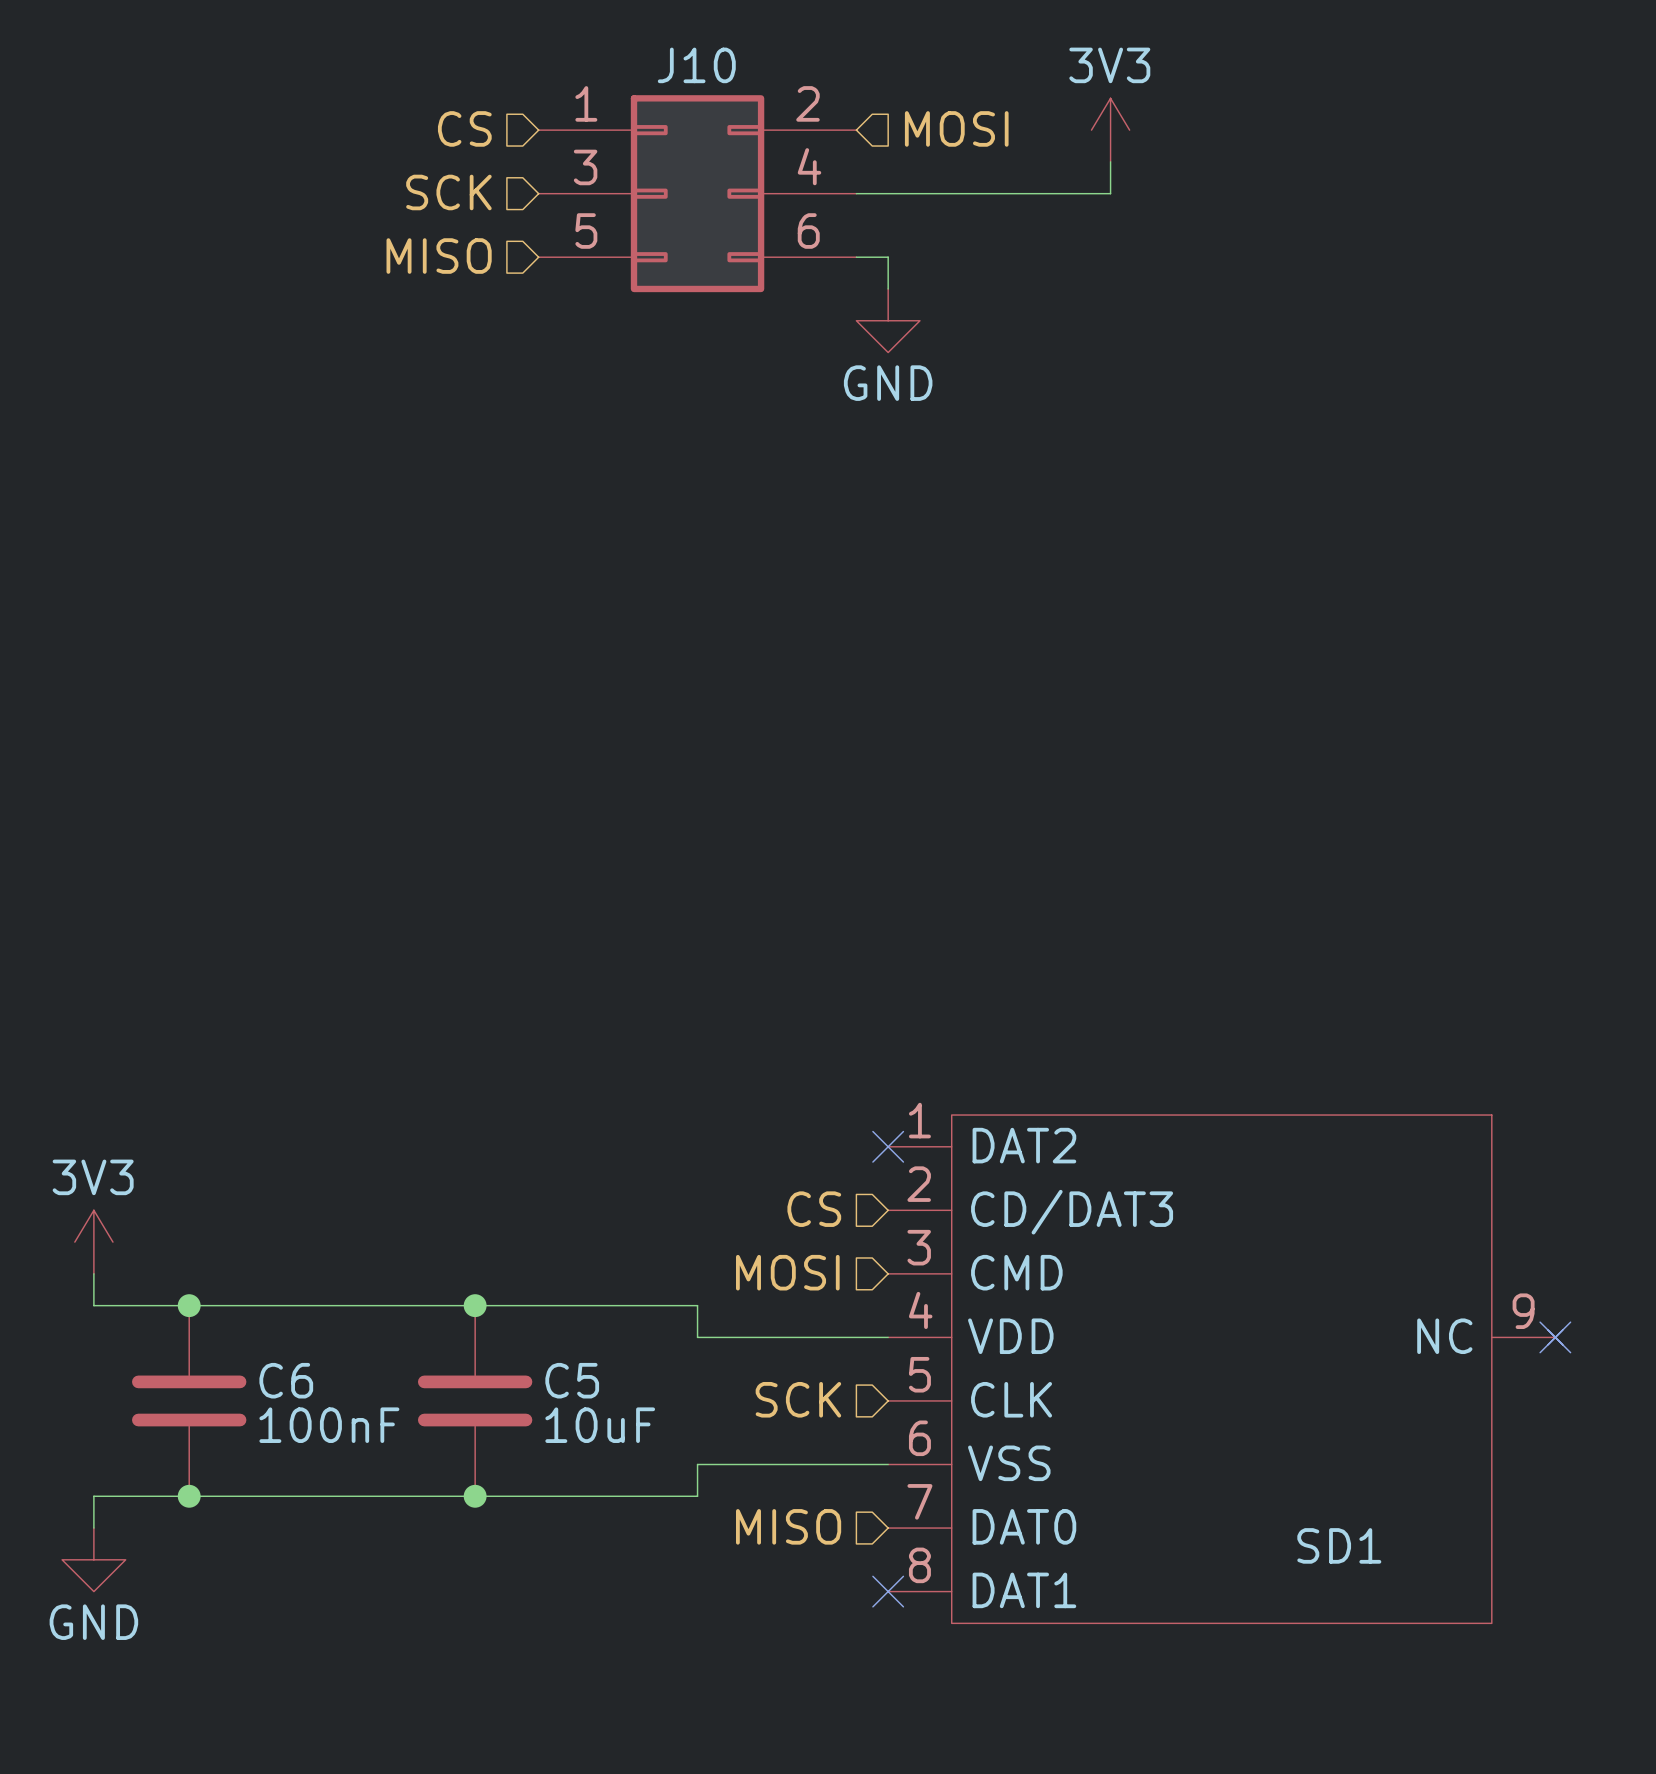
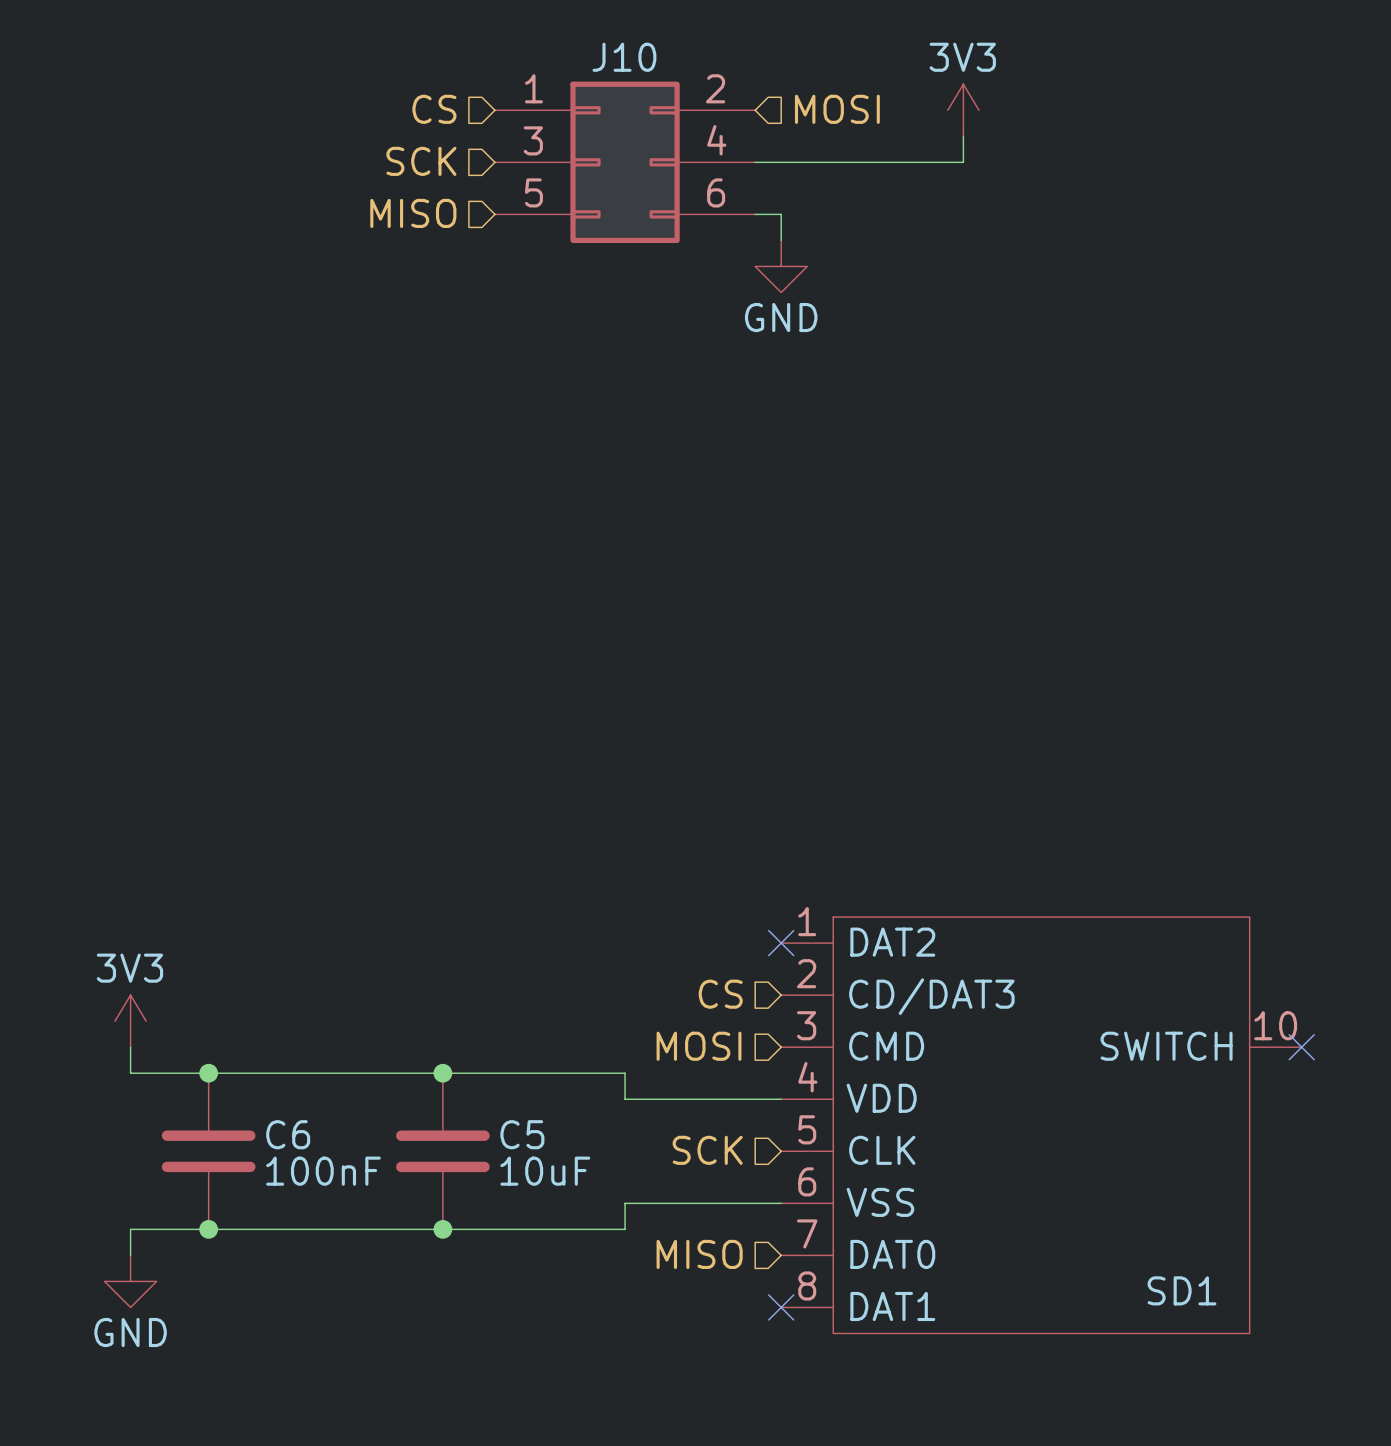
SD1 symbol: [888, 1115, 1563, 1624] -> [781, 917, 1302, 1334]
no-connect mark position: (1555, 1337) -> (1301, 1047)
SD1 name position: SD1 (1339, 1545) -> SD1 (1182, 1290)

